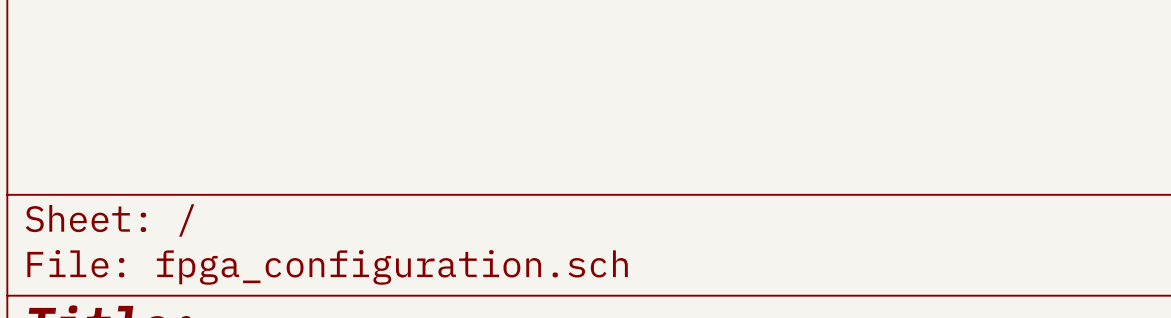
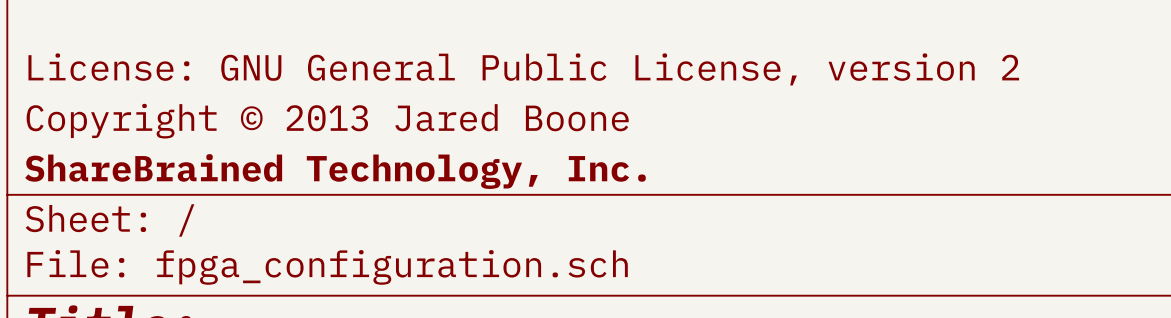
title block: none -> License: GNU General Public License, version 2 (523, 69)
title block: none -> Copyright © 2013 Jared Boone (327, 121)
title block: none -> ShareBrained Technology, Inc. (335, 171)

